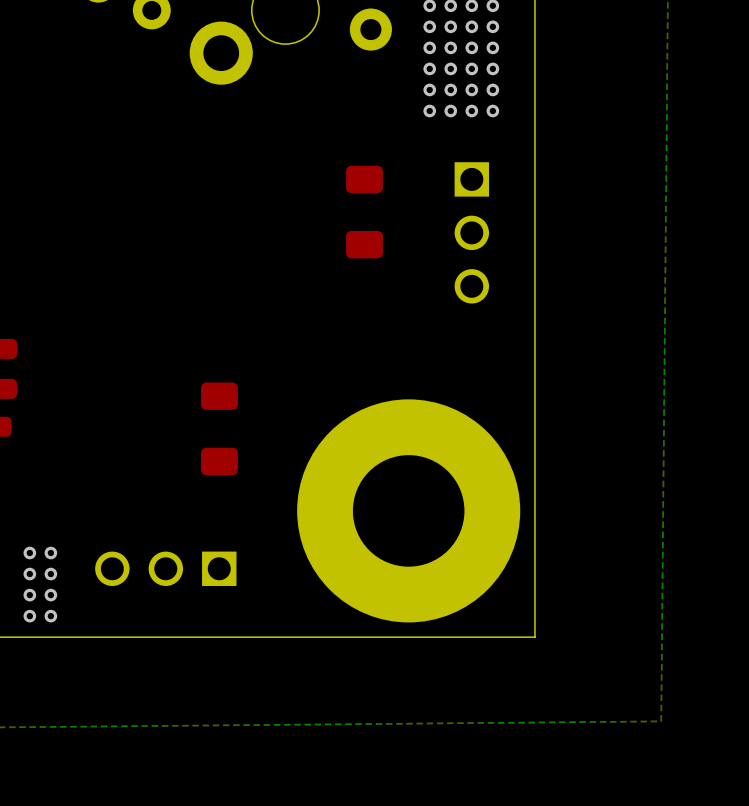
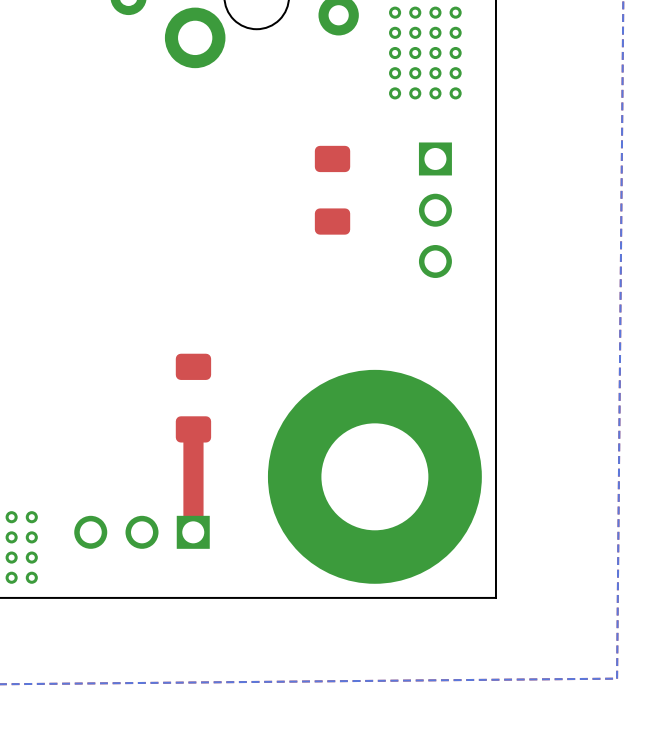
top track: none -> (193, 429) (193, 532)

